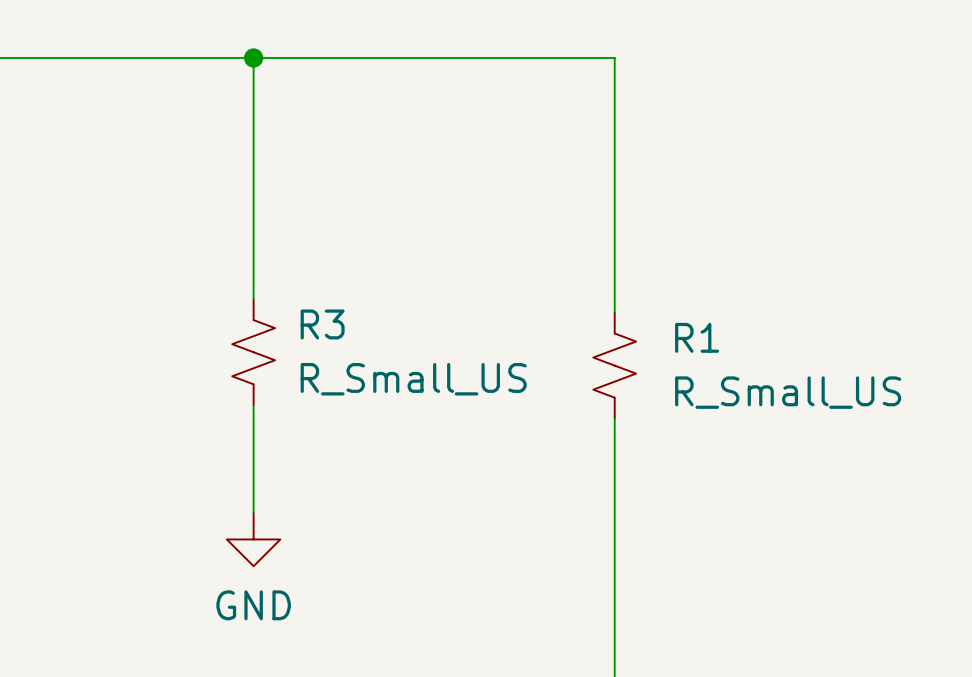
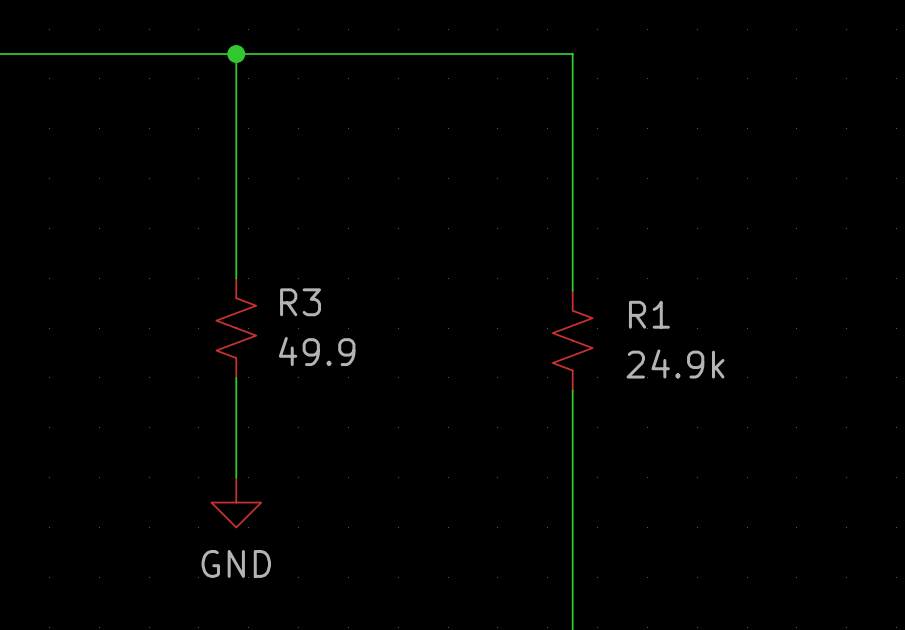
R3 value: R_Small_US (413, 379) -> 49.9 (317, 351)
R1 value: R_Small_US (788, 392) -> 24.9k (675, 363)

